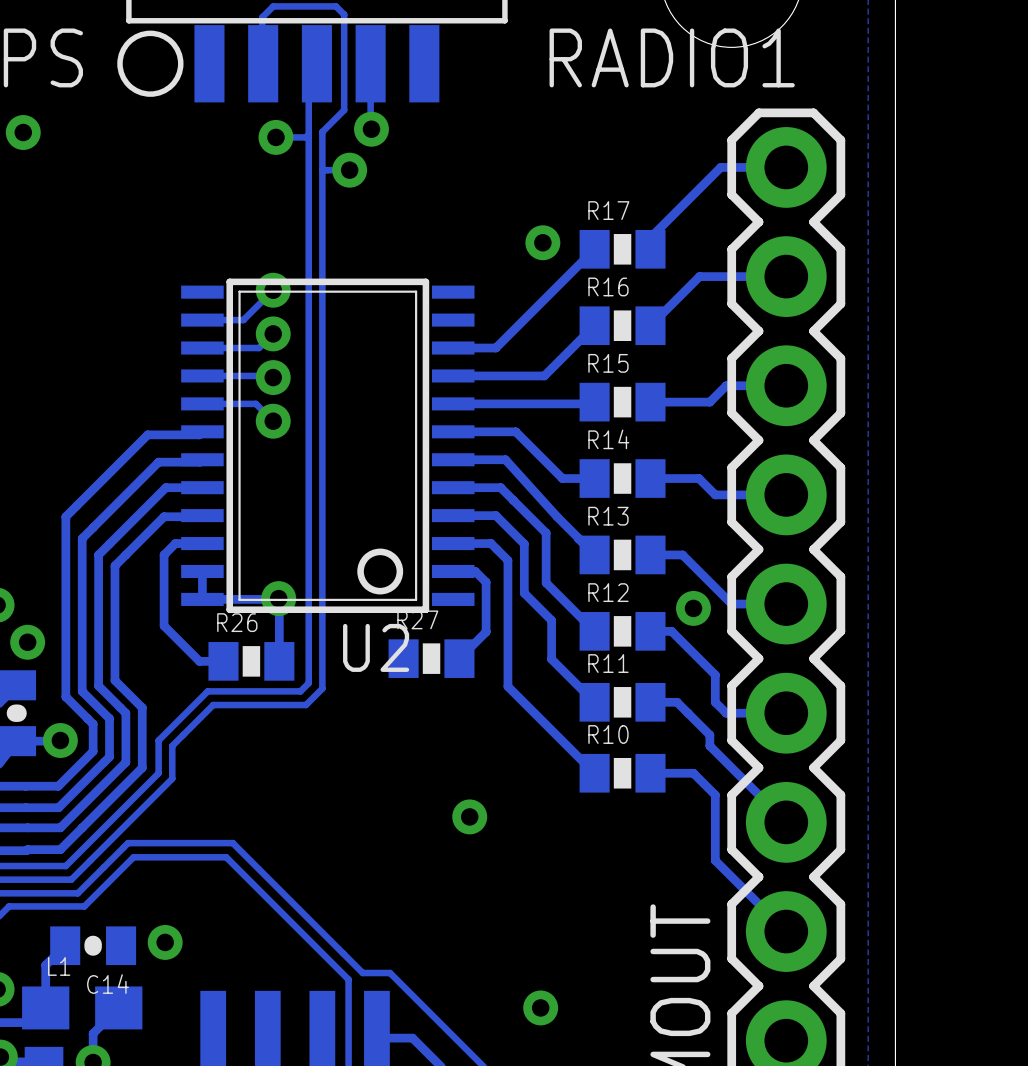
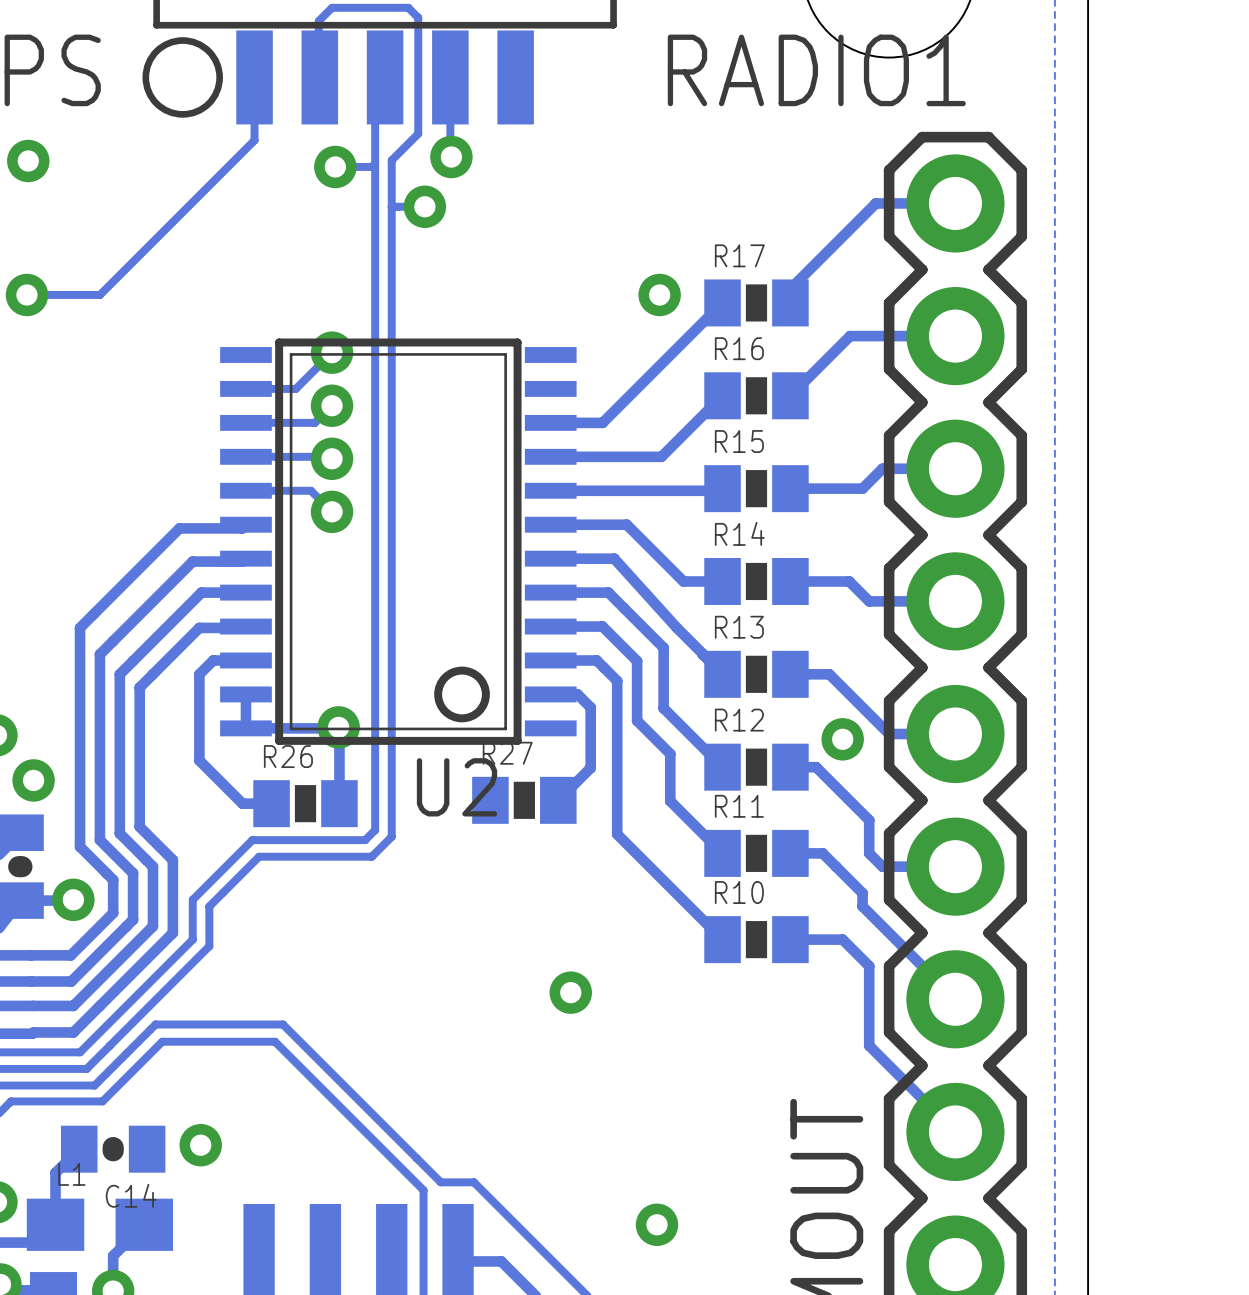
track: none -> (254, 77) (254, 140) (99, 294) (26, 294)
via: none -> (26, 294)

